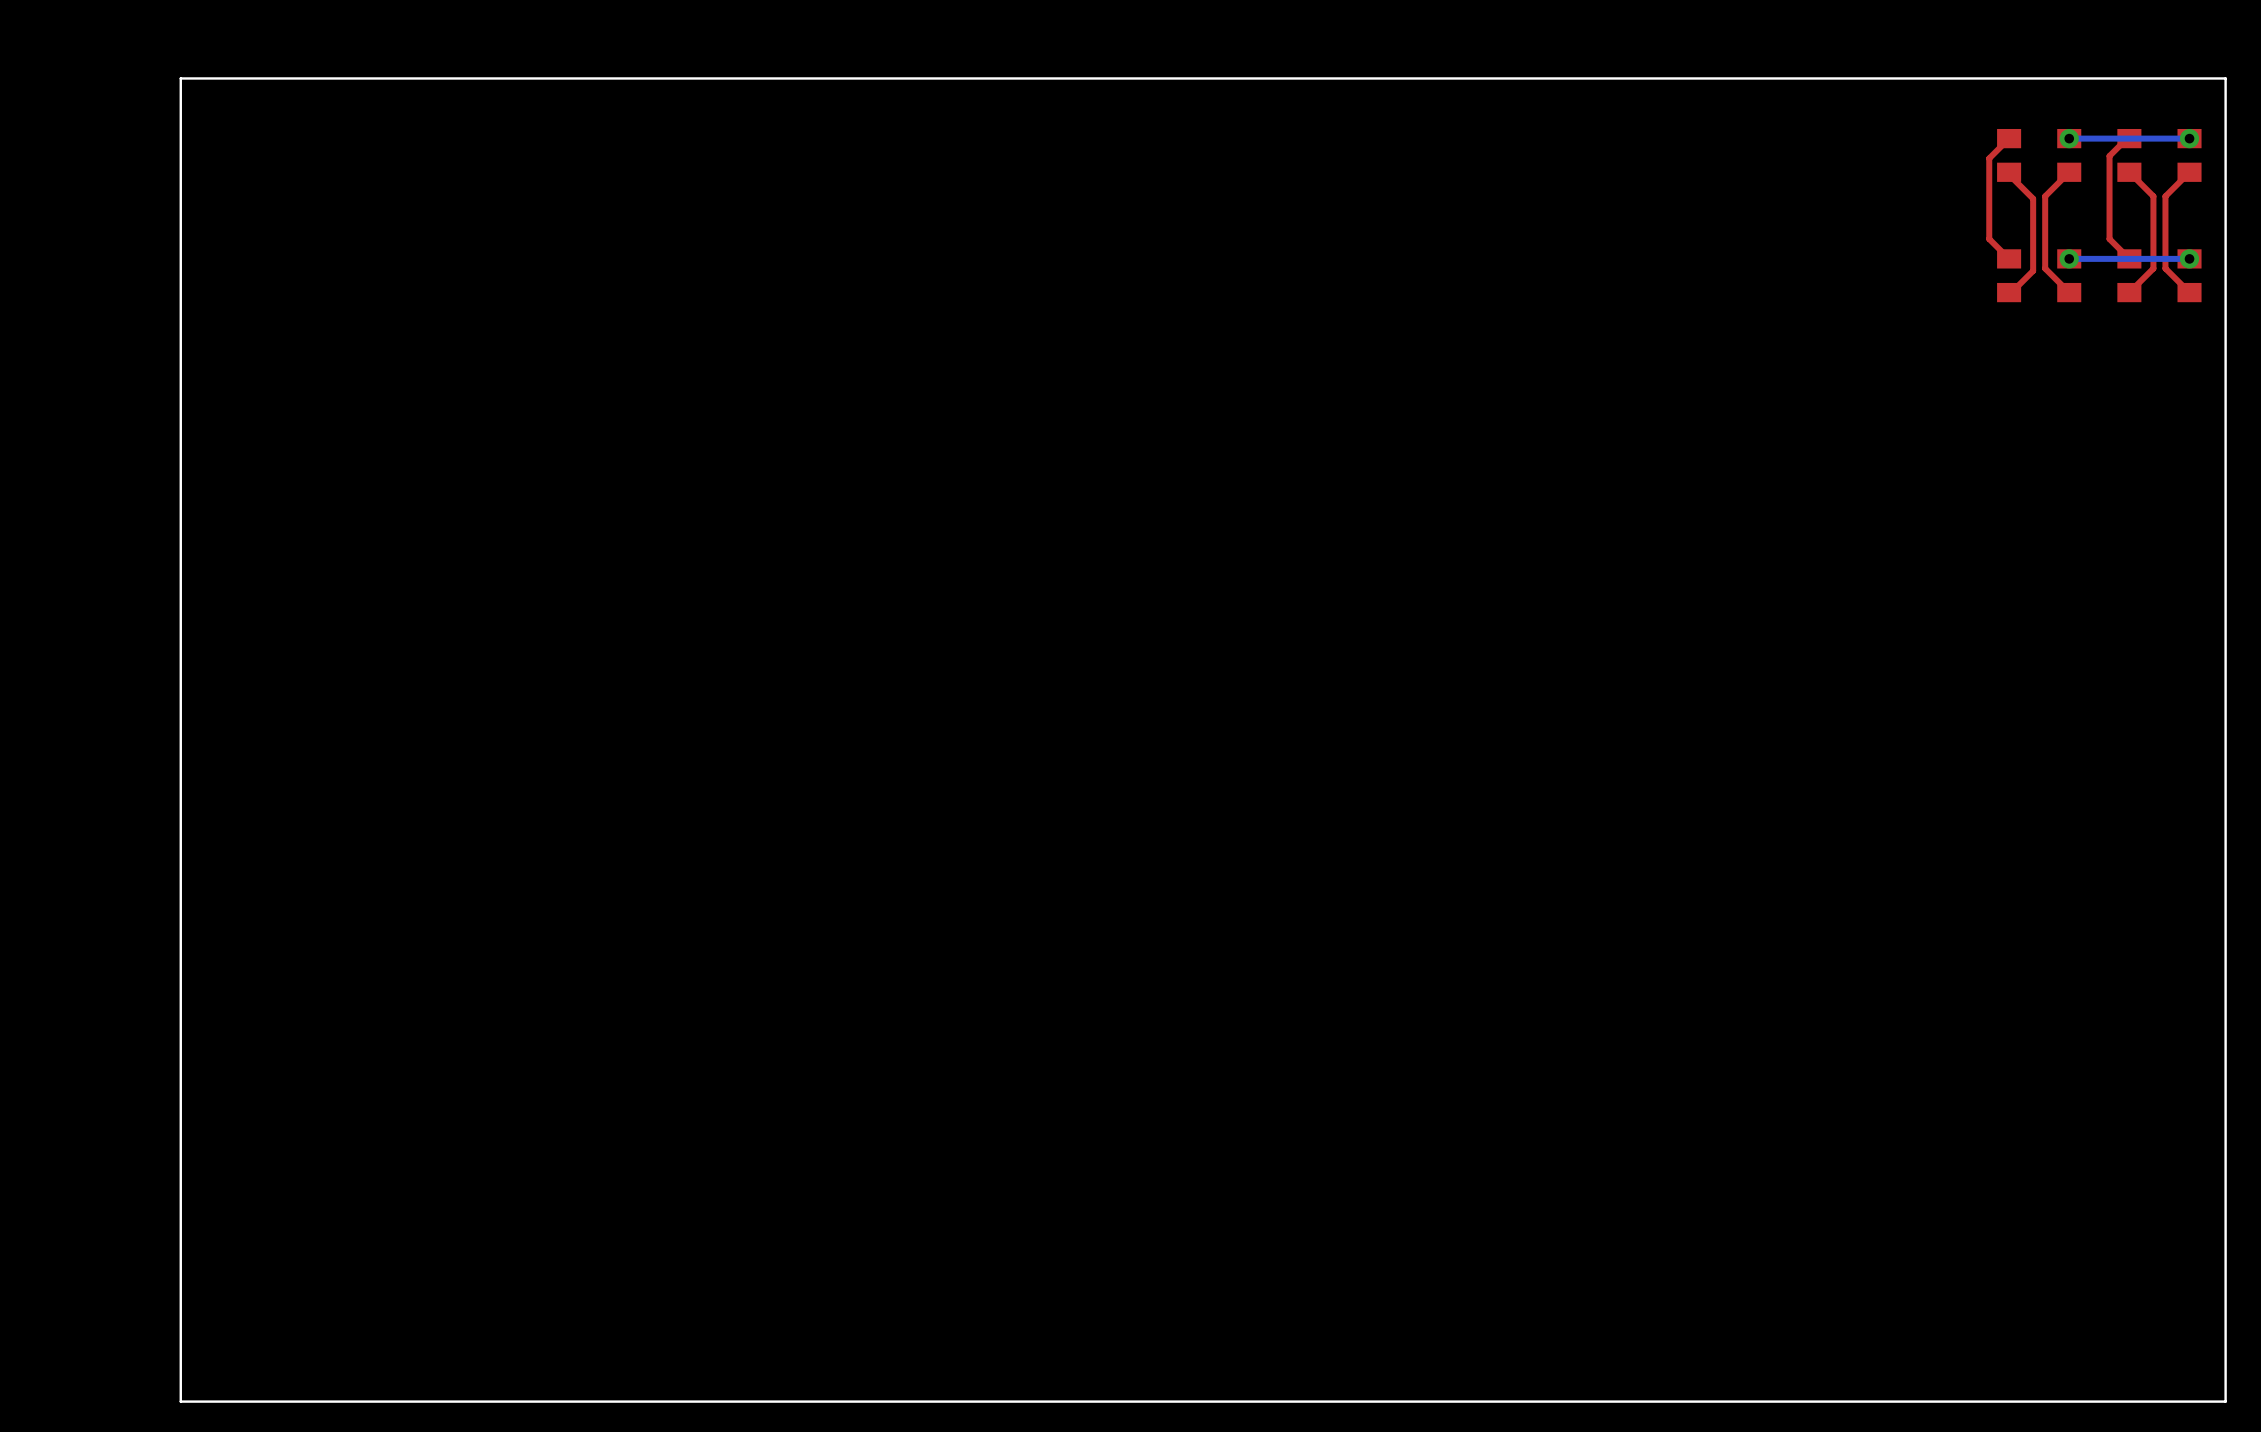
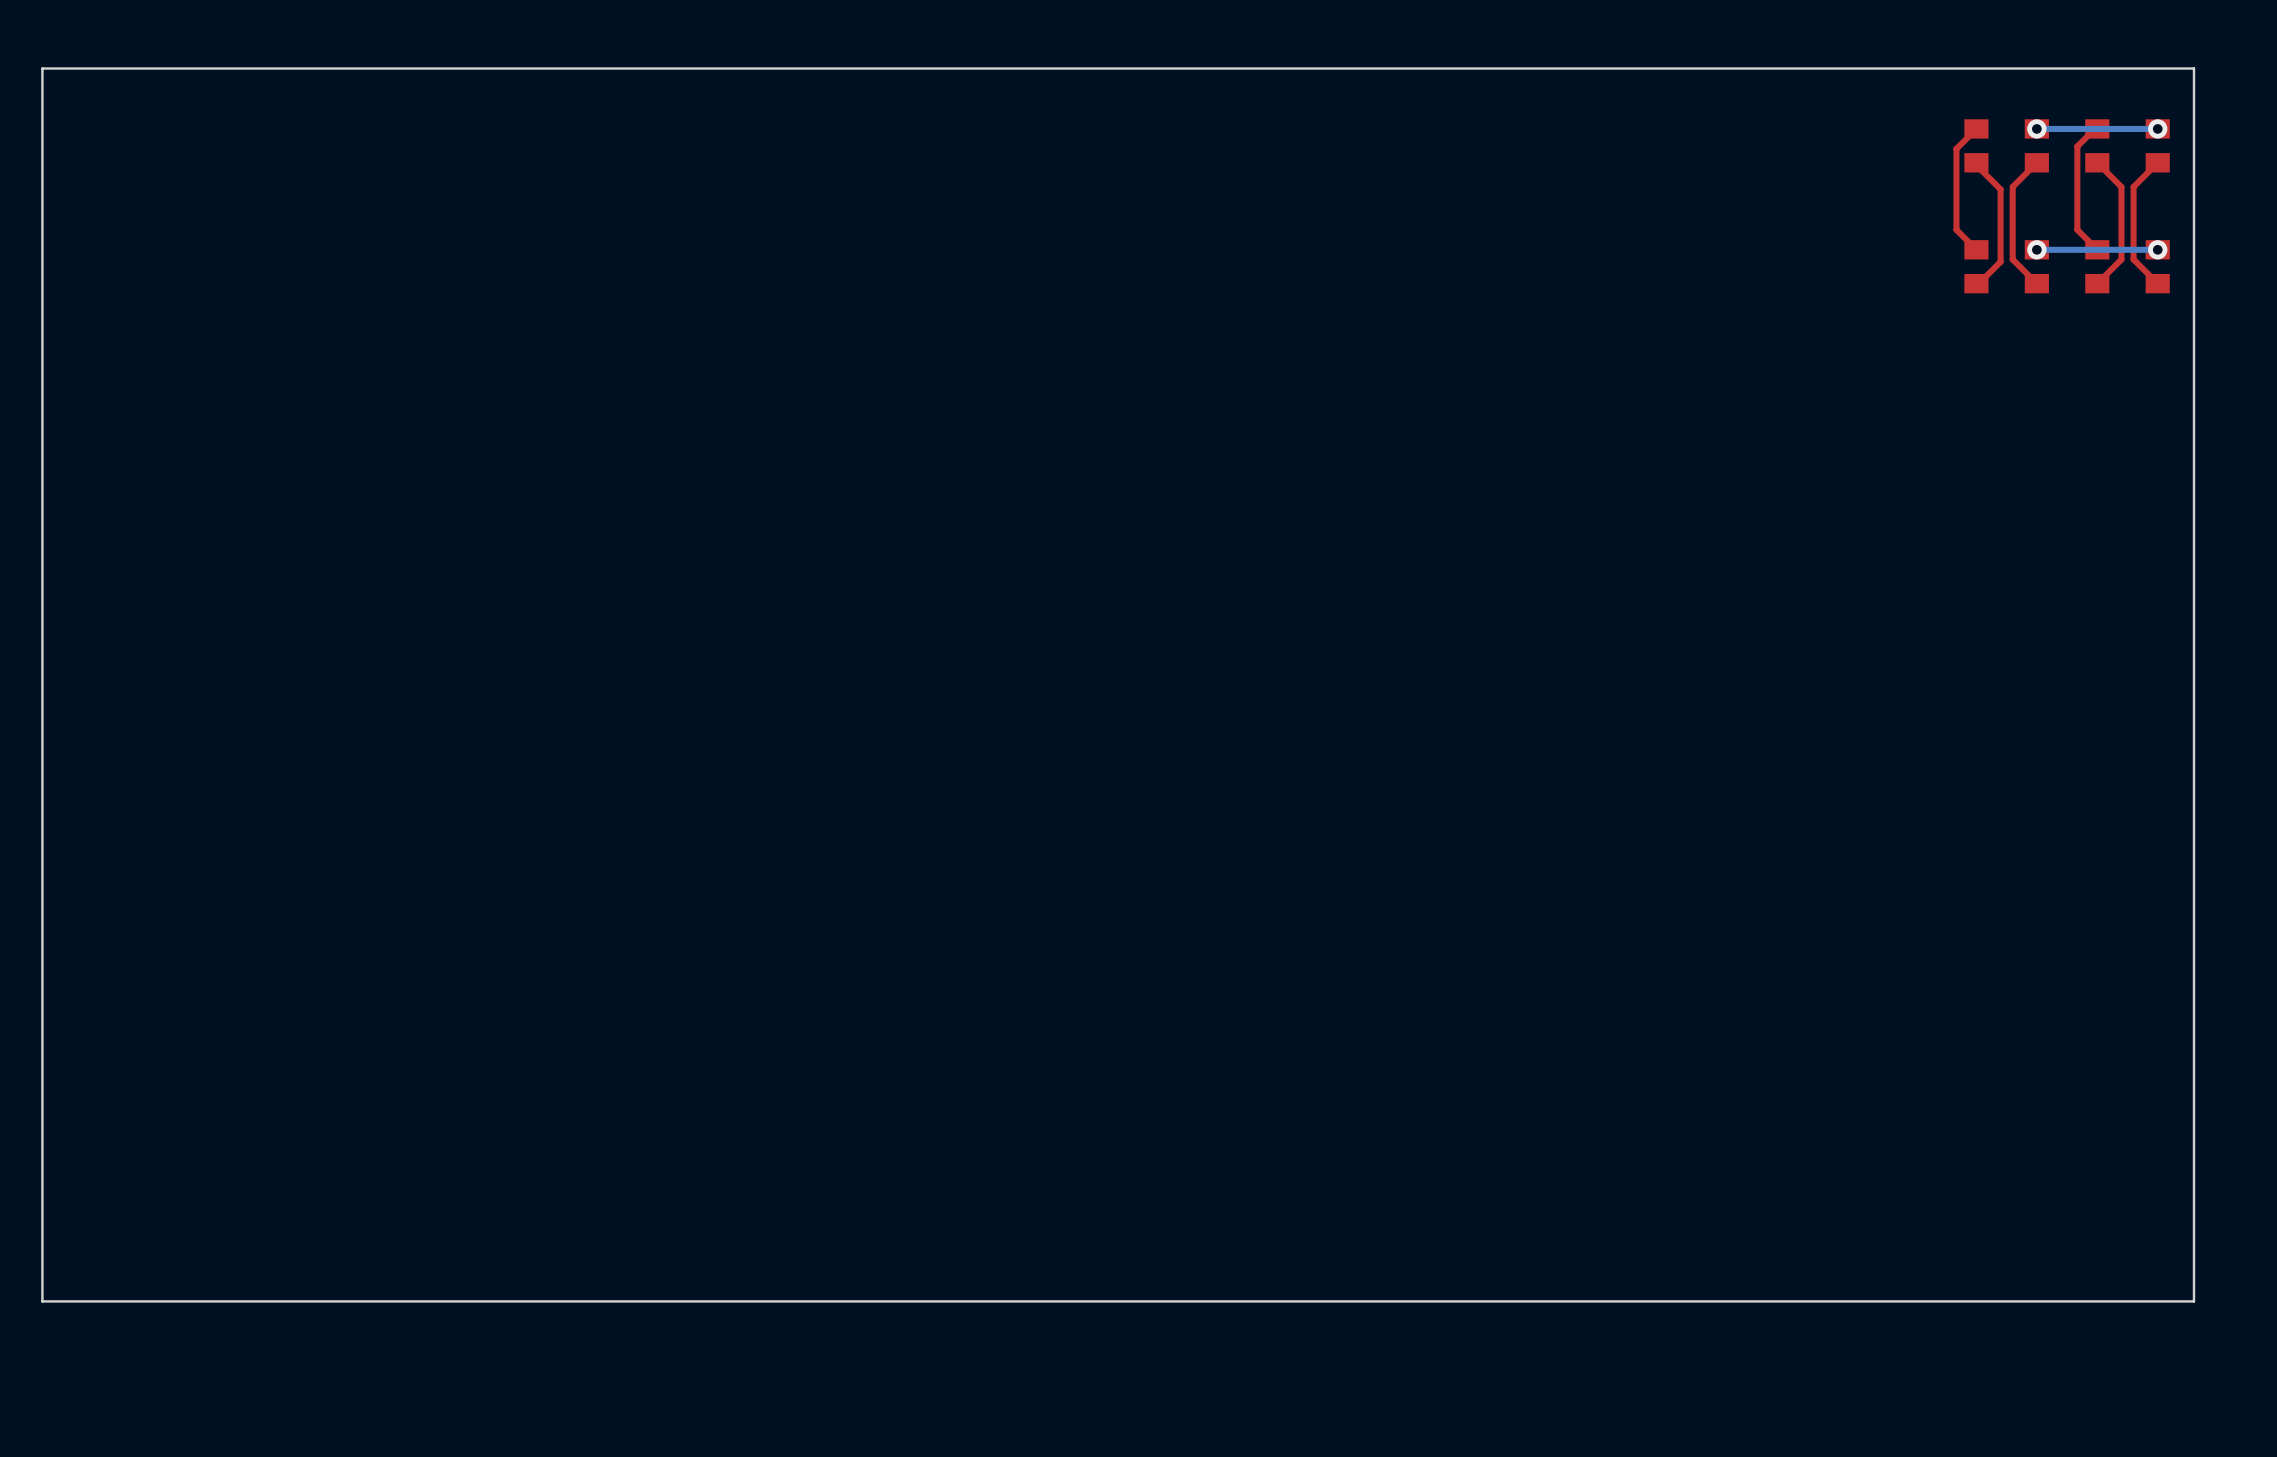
board edge: (180, 78) (180, 1401) (2225, 1401) (2225, 1305) -> (139, 68) (42, 68) (42, 1301) (2194, 1301)

